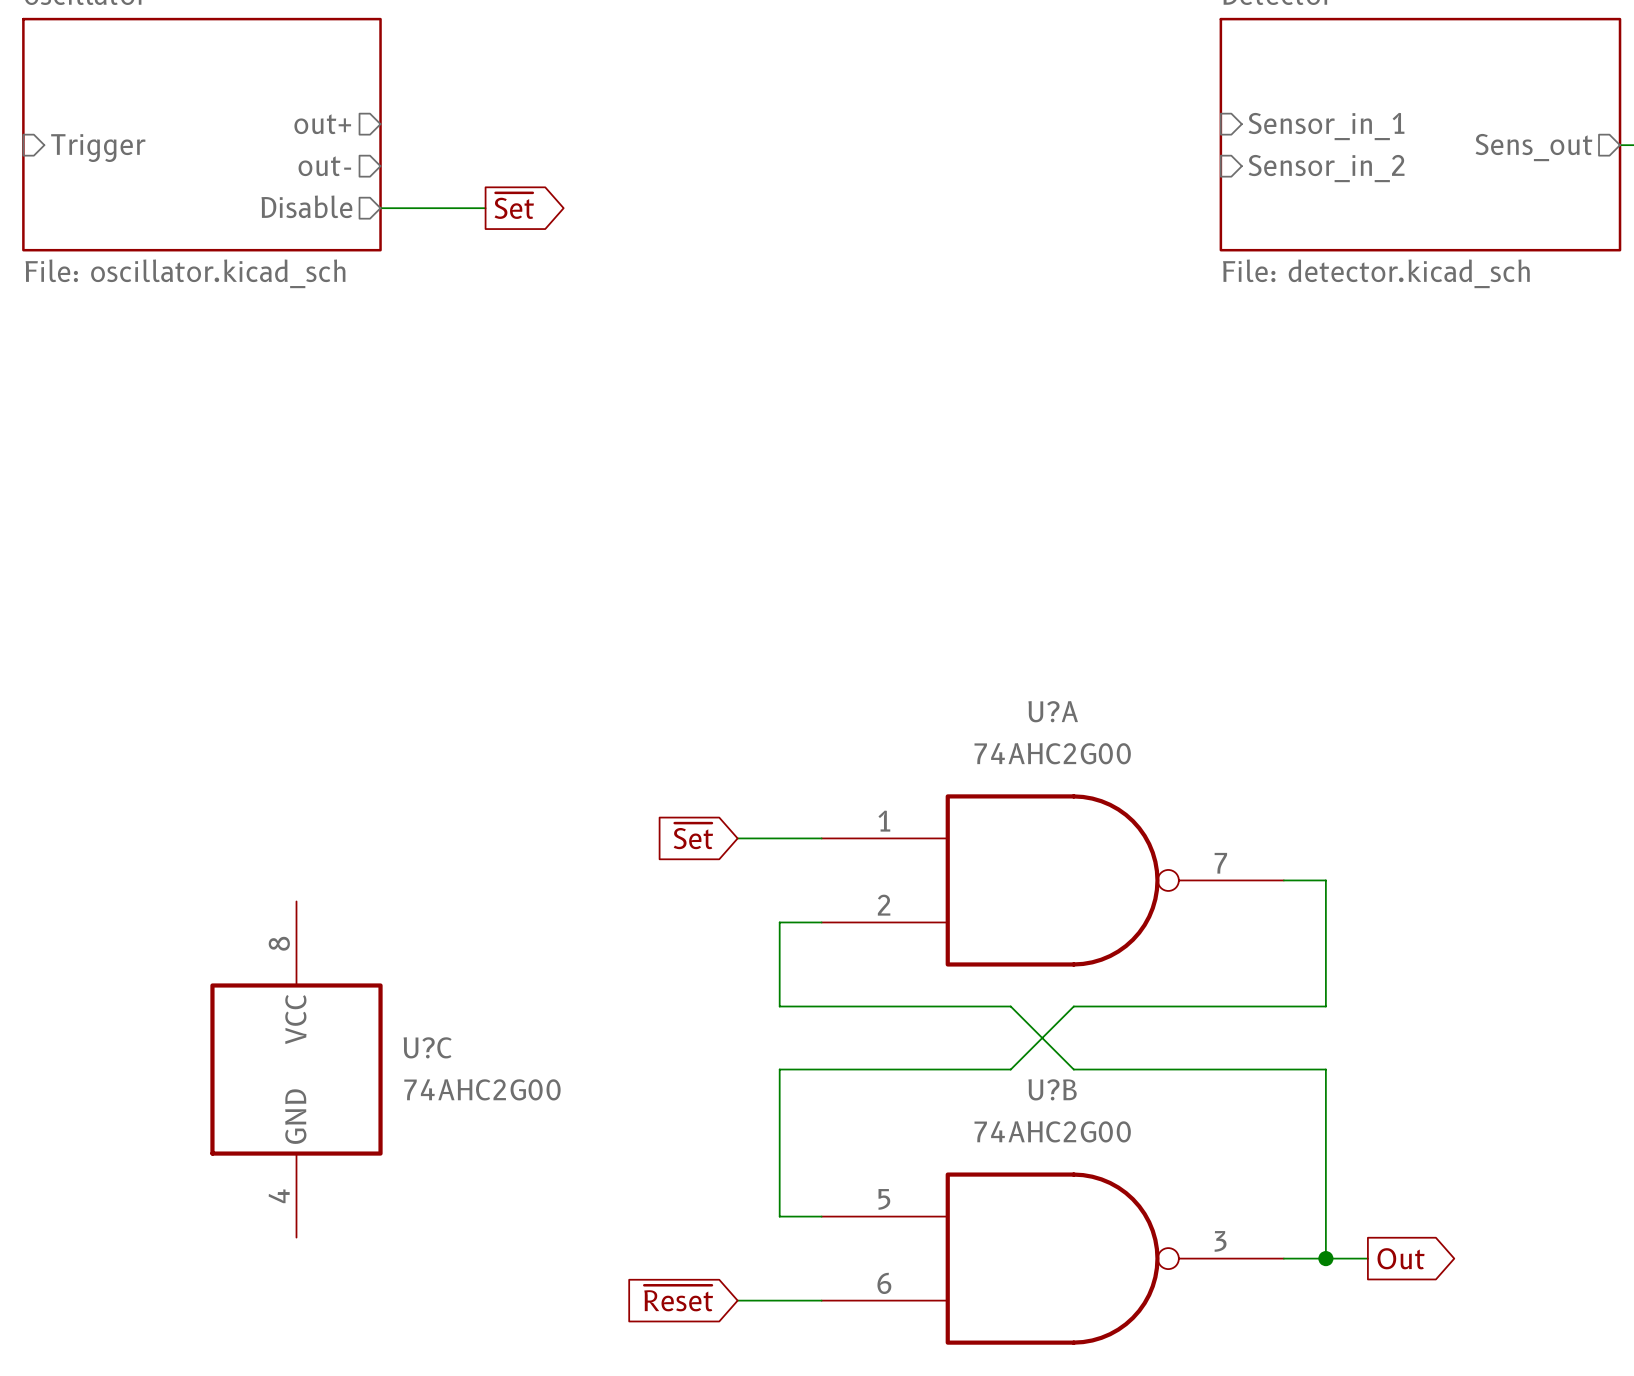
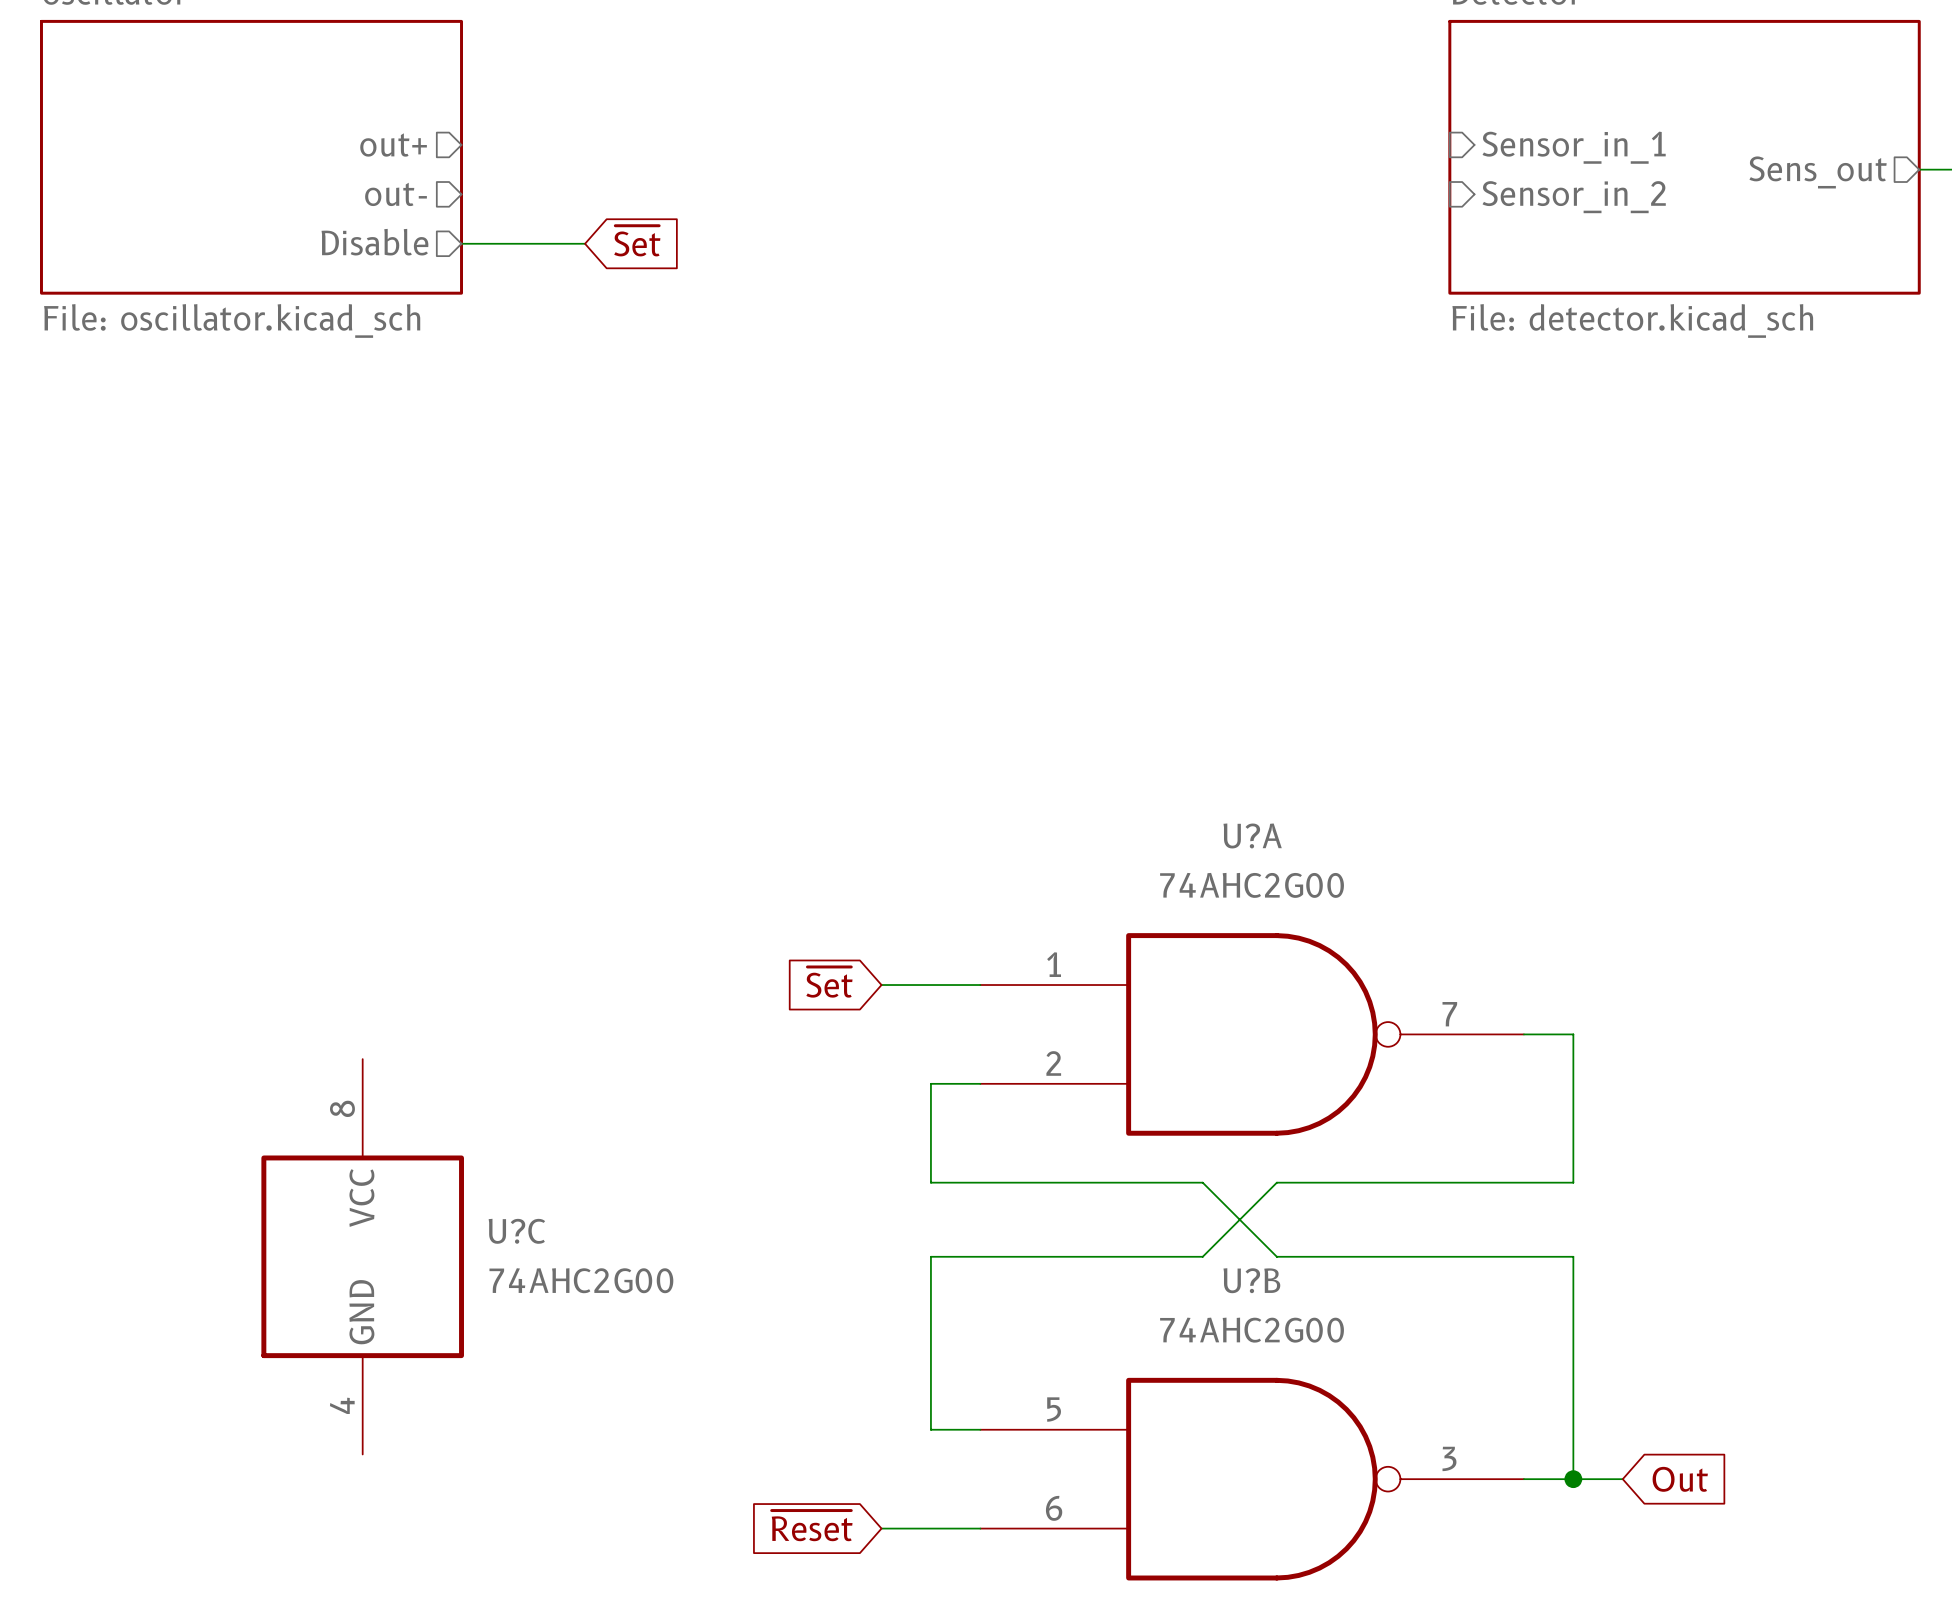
sheet pin: Trigger (98, 148) -> none
global label shape: output (514, 205) -> input (637, 241)
global label shape: output (1401, 1258) -> input (1680, 1479)

